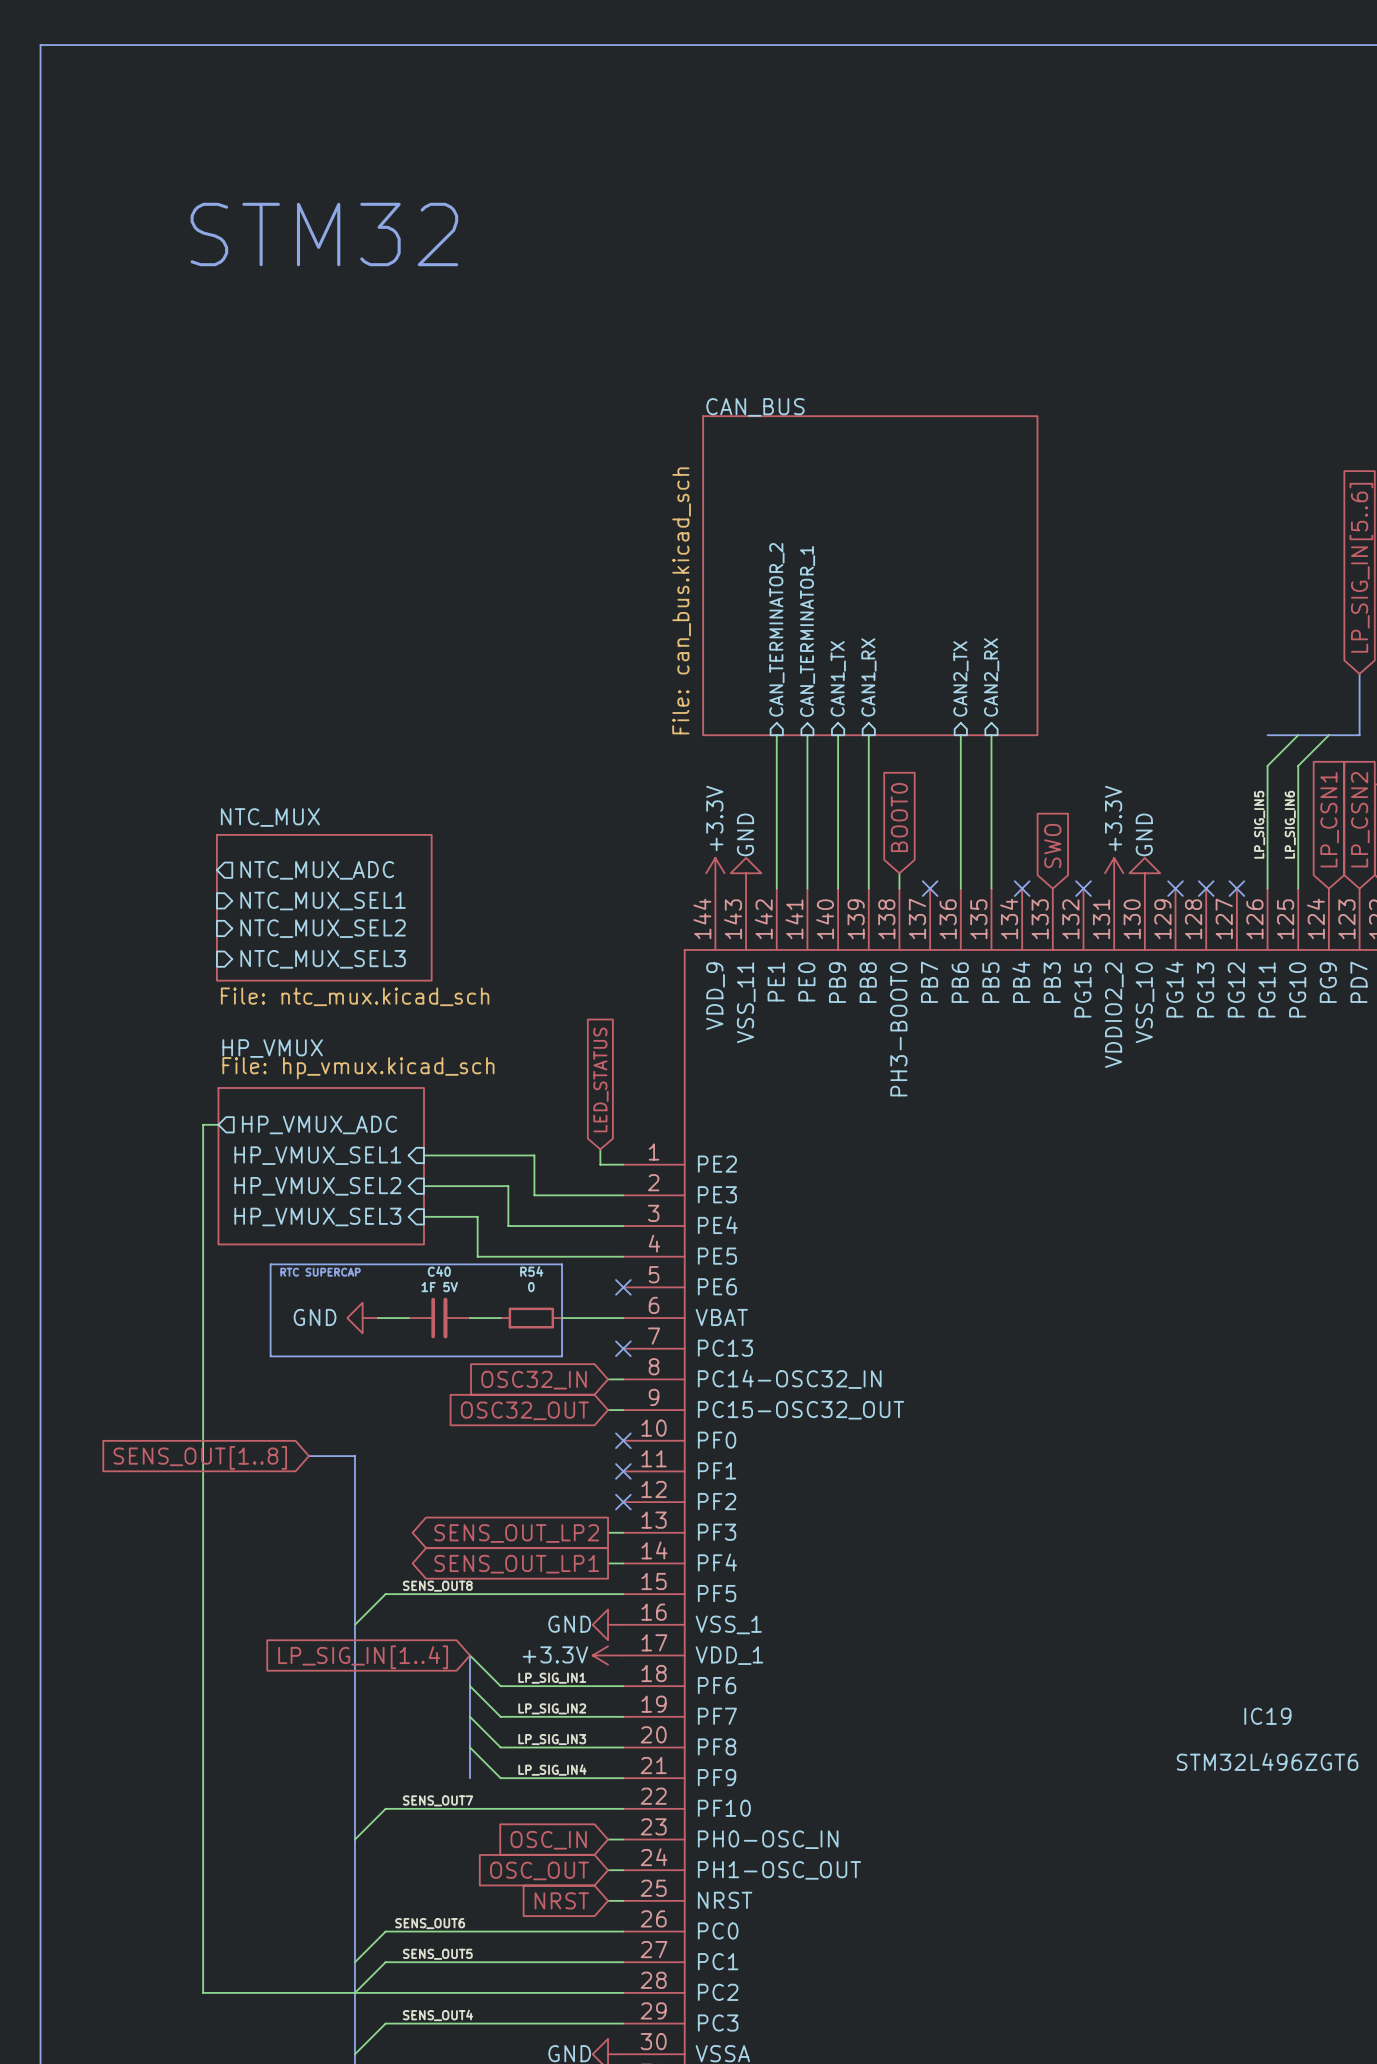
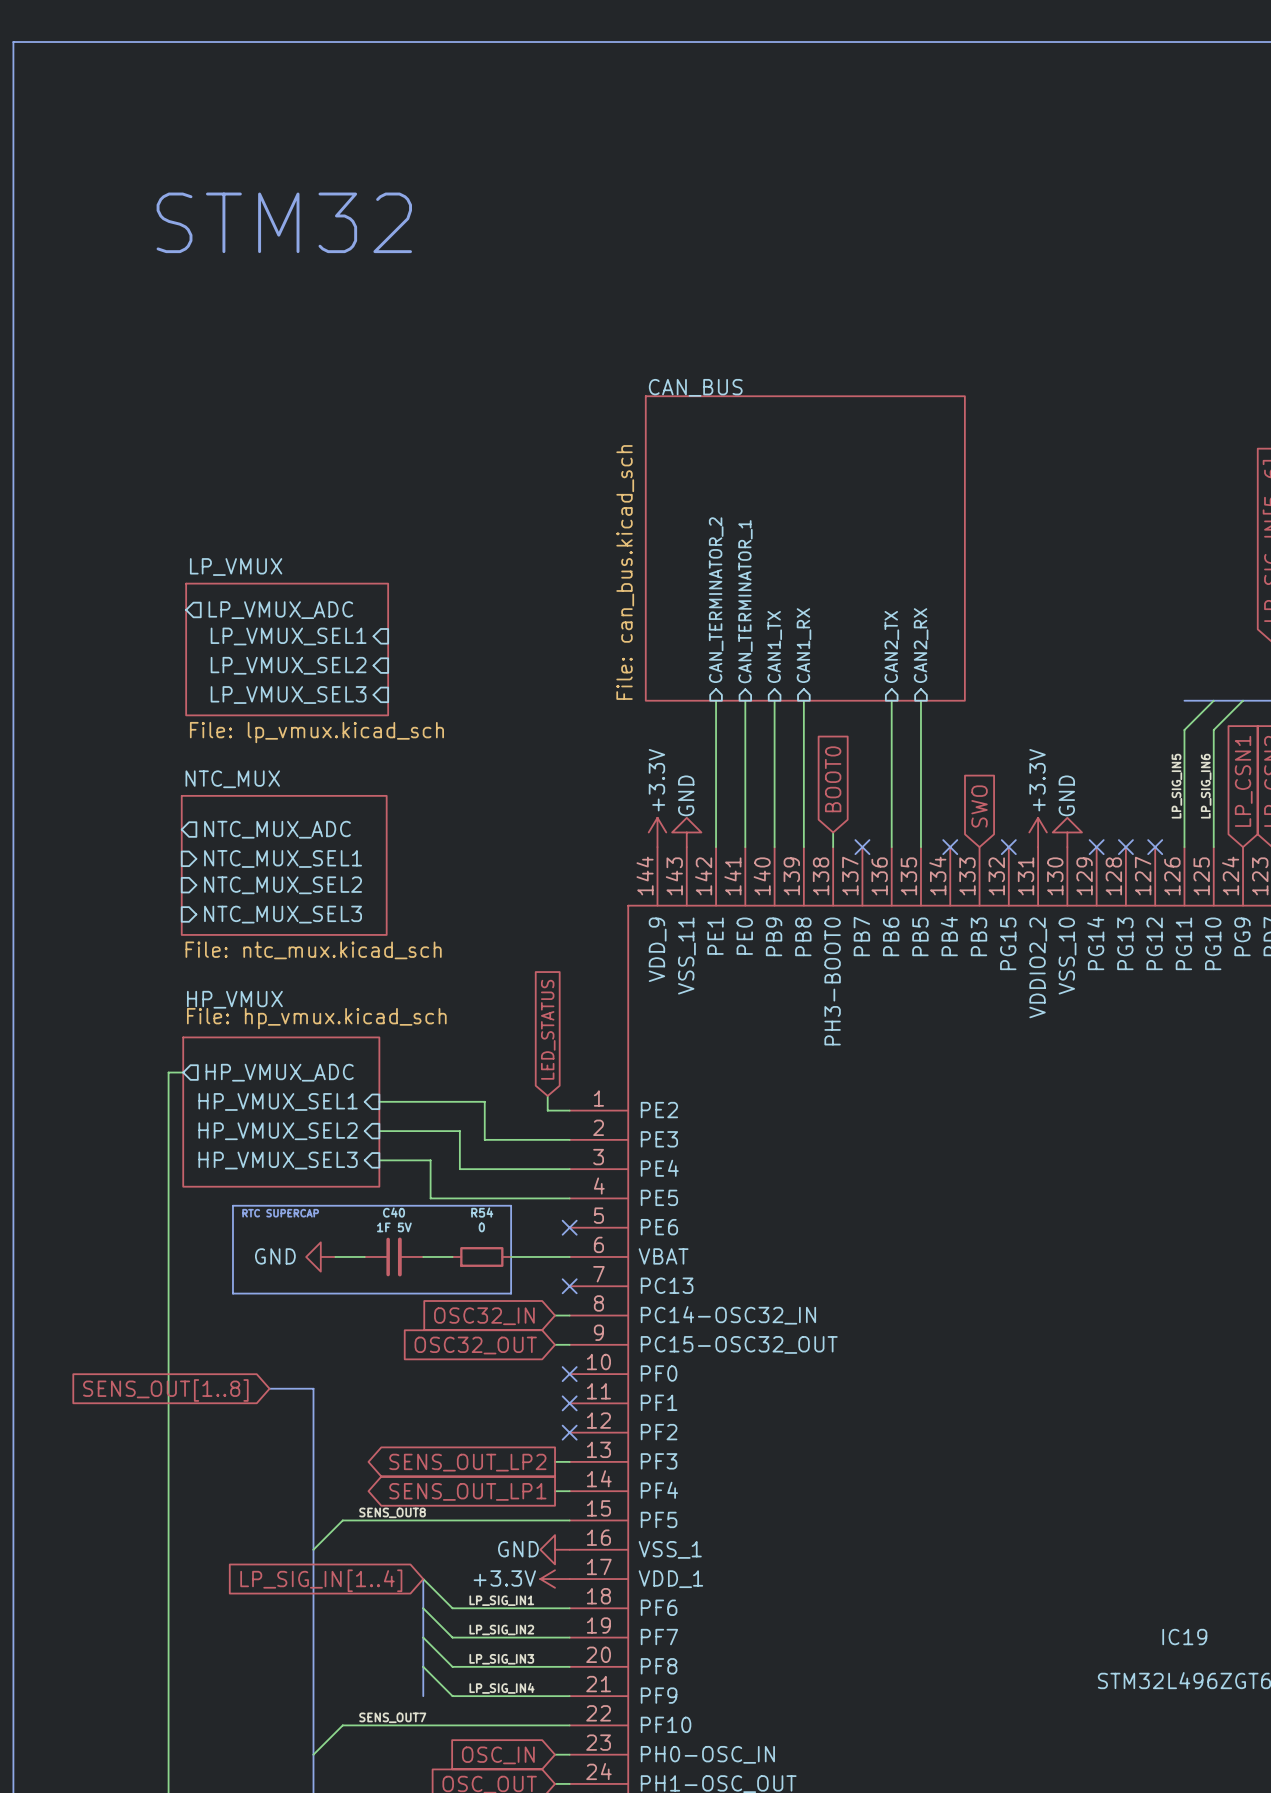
sheet pin: none -> LP_VMUX_ADC (280, 610)
sheet pin: none -> LP_VMUX_SEL1 (288, 636)
sheet LP_VMUX: none -> File: lp_vmux.kicad_sch (287, 649)
sheet pin: none -> LP_VMUX_SEL2 (288, 665)
sheet pin: none -> LP_VMUX_SEL3 (288, 695)

